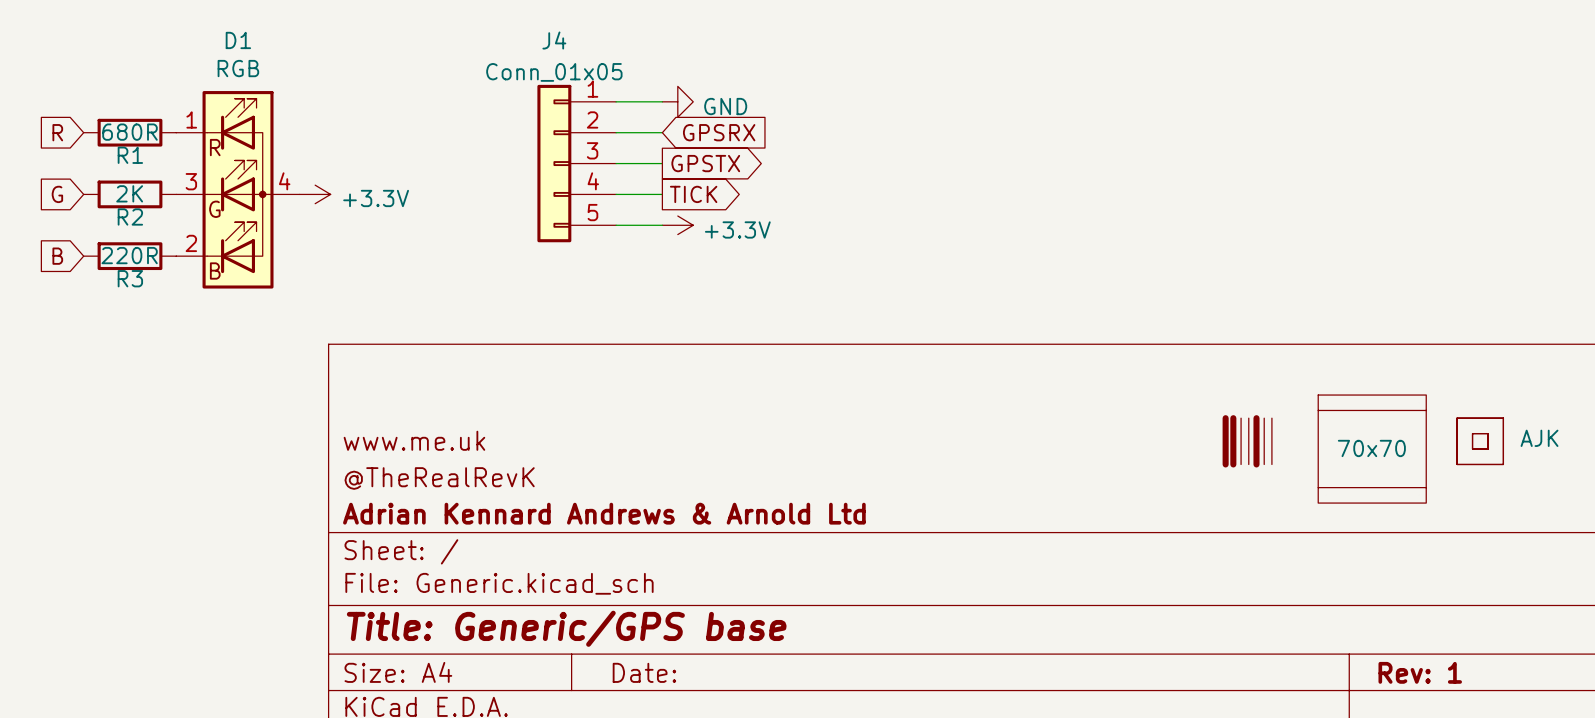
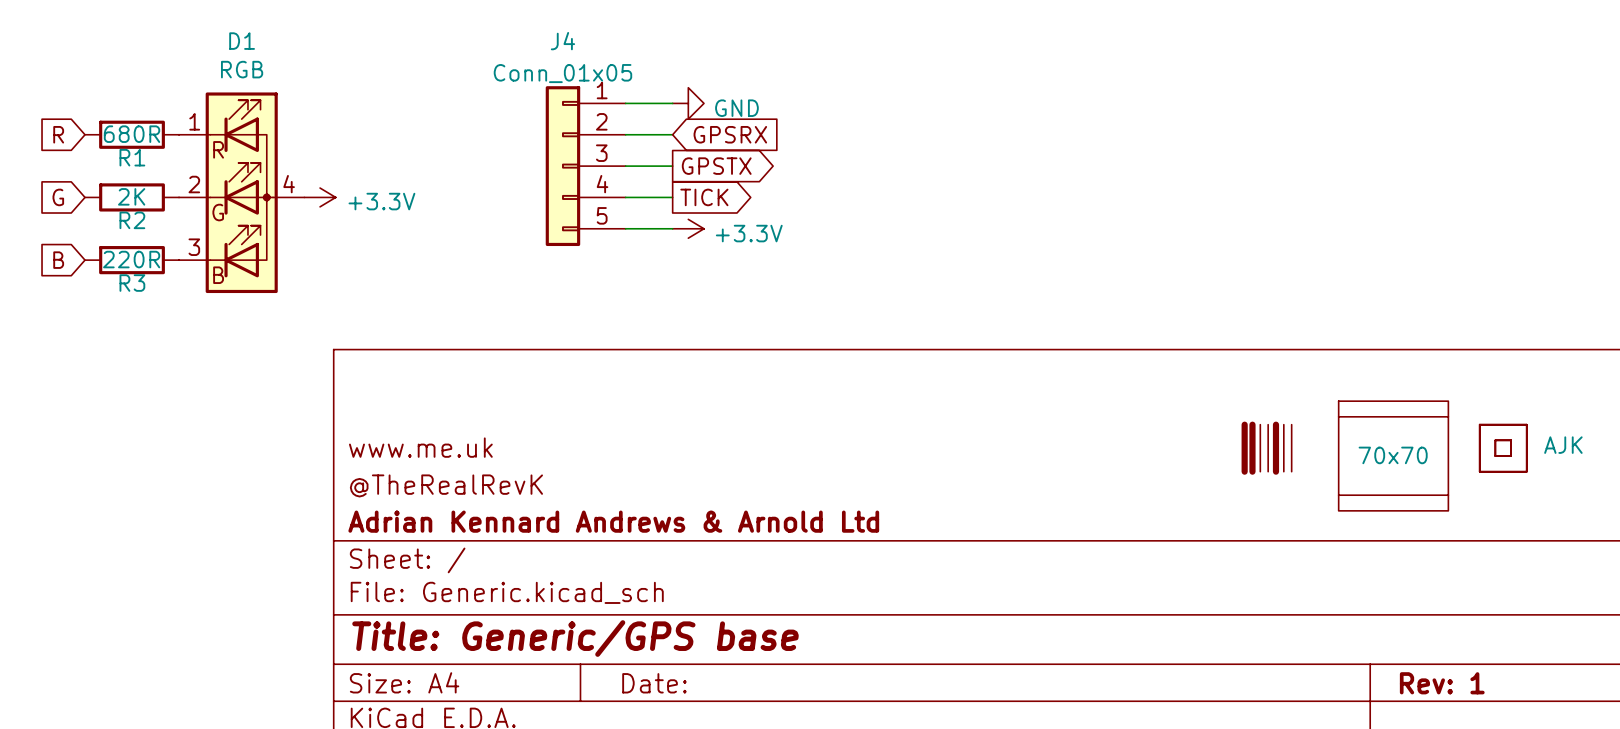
D1 pin number: 3 (191, 181) -> 2 (194, 184)
D1 pin number: 2 (191, 243) -> 3 (194, 247)

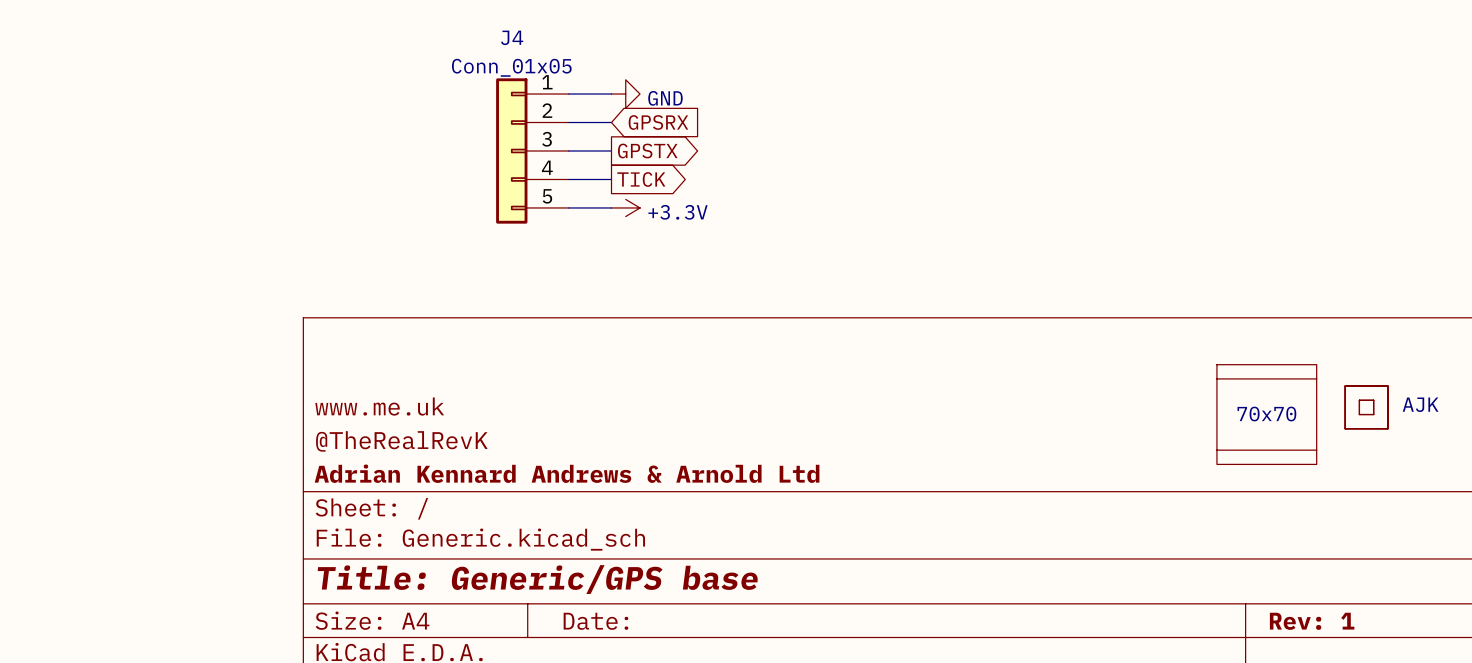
global label: R (58, 134) -> none
R1: 680R (132, 134) -> none
D1: RGB (241, 192) -> none
global label: G (58, 197) -> none
R2: 2K (132, 197) -> none
power symbol: +3.3V (320, 197) -> none
global label: B (58, 260) -> none
R3: 220R (132, 260) -> none
part: (1266, 448) -> none

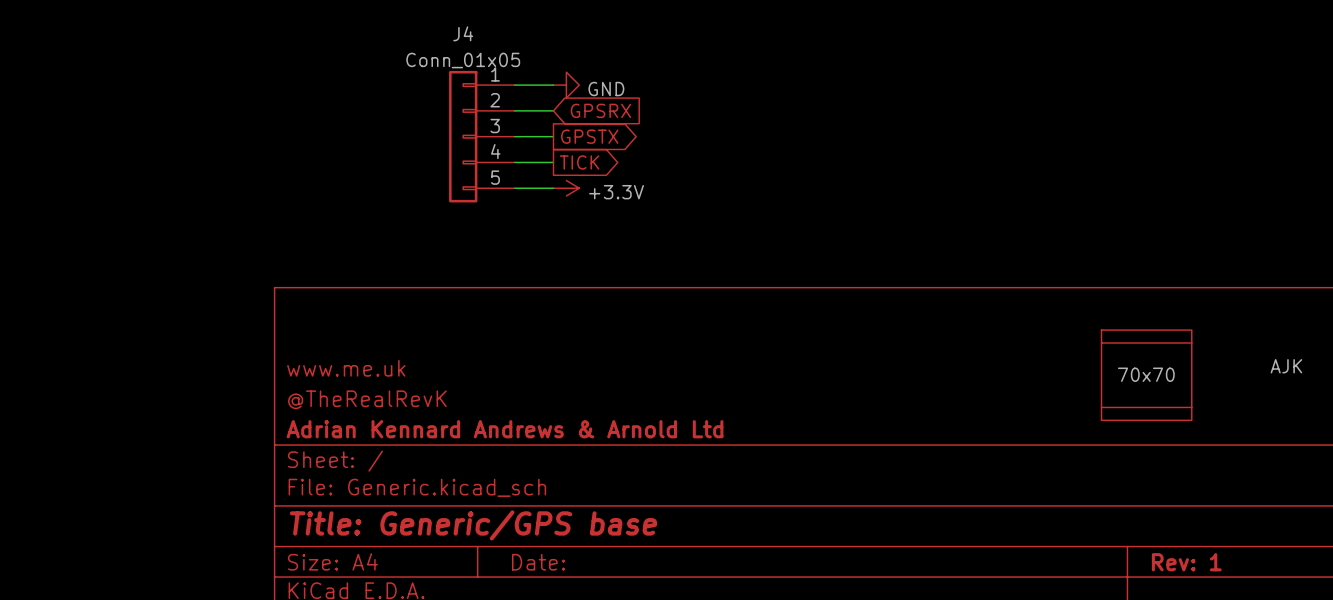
part: (1366, 407) -> none

